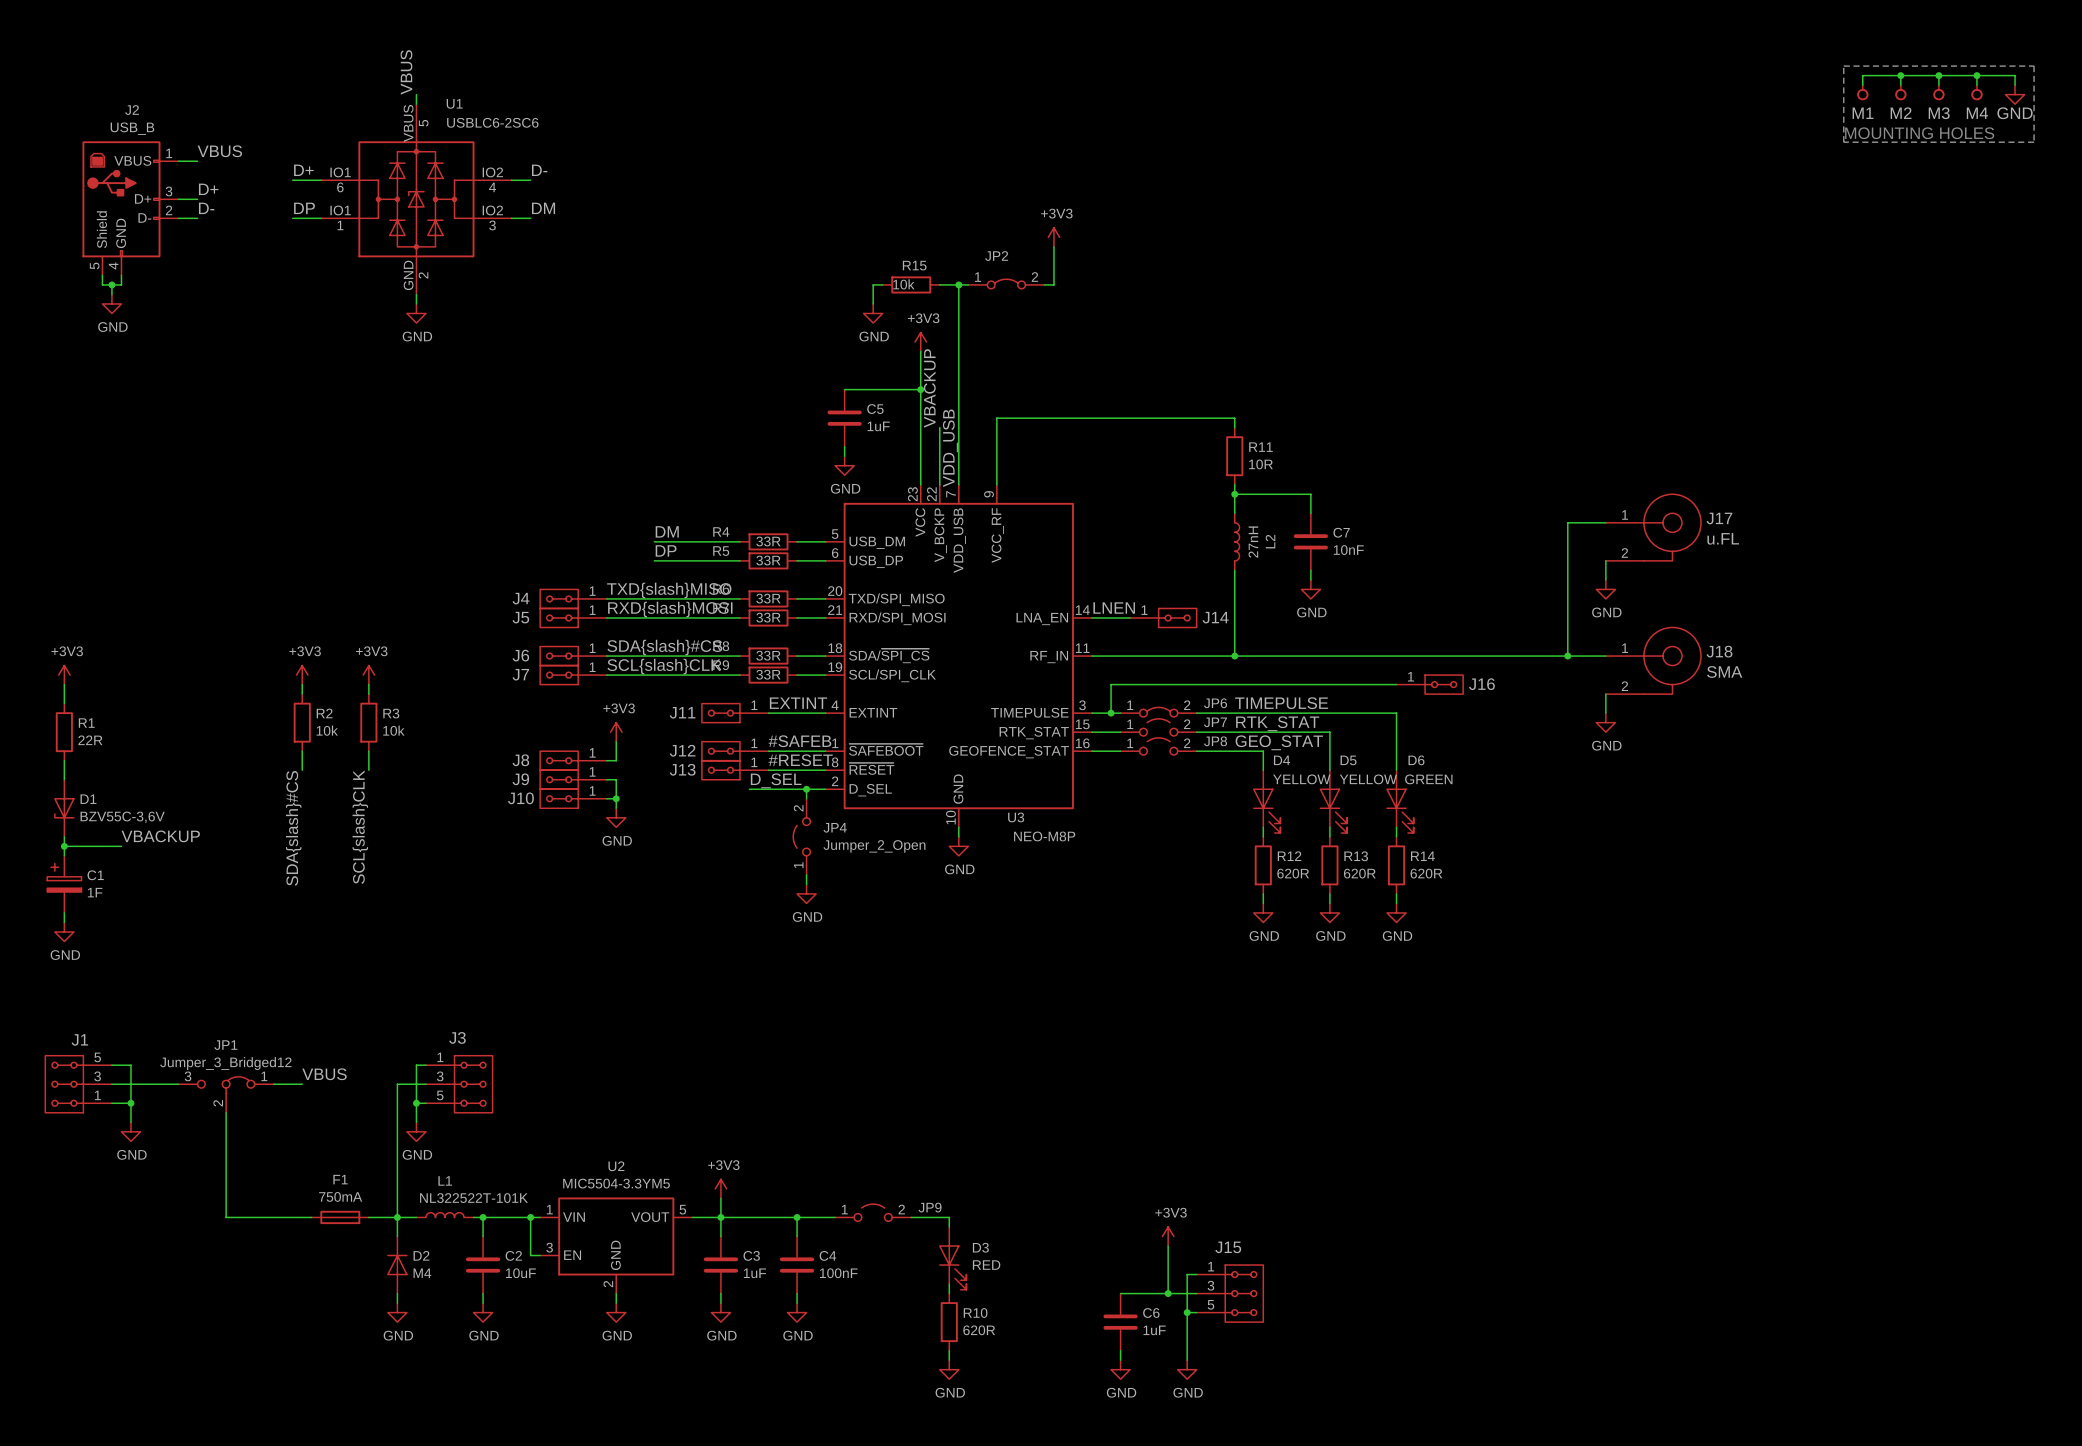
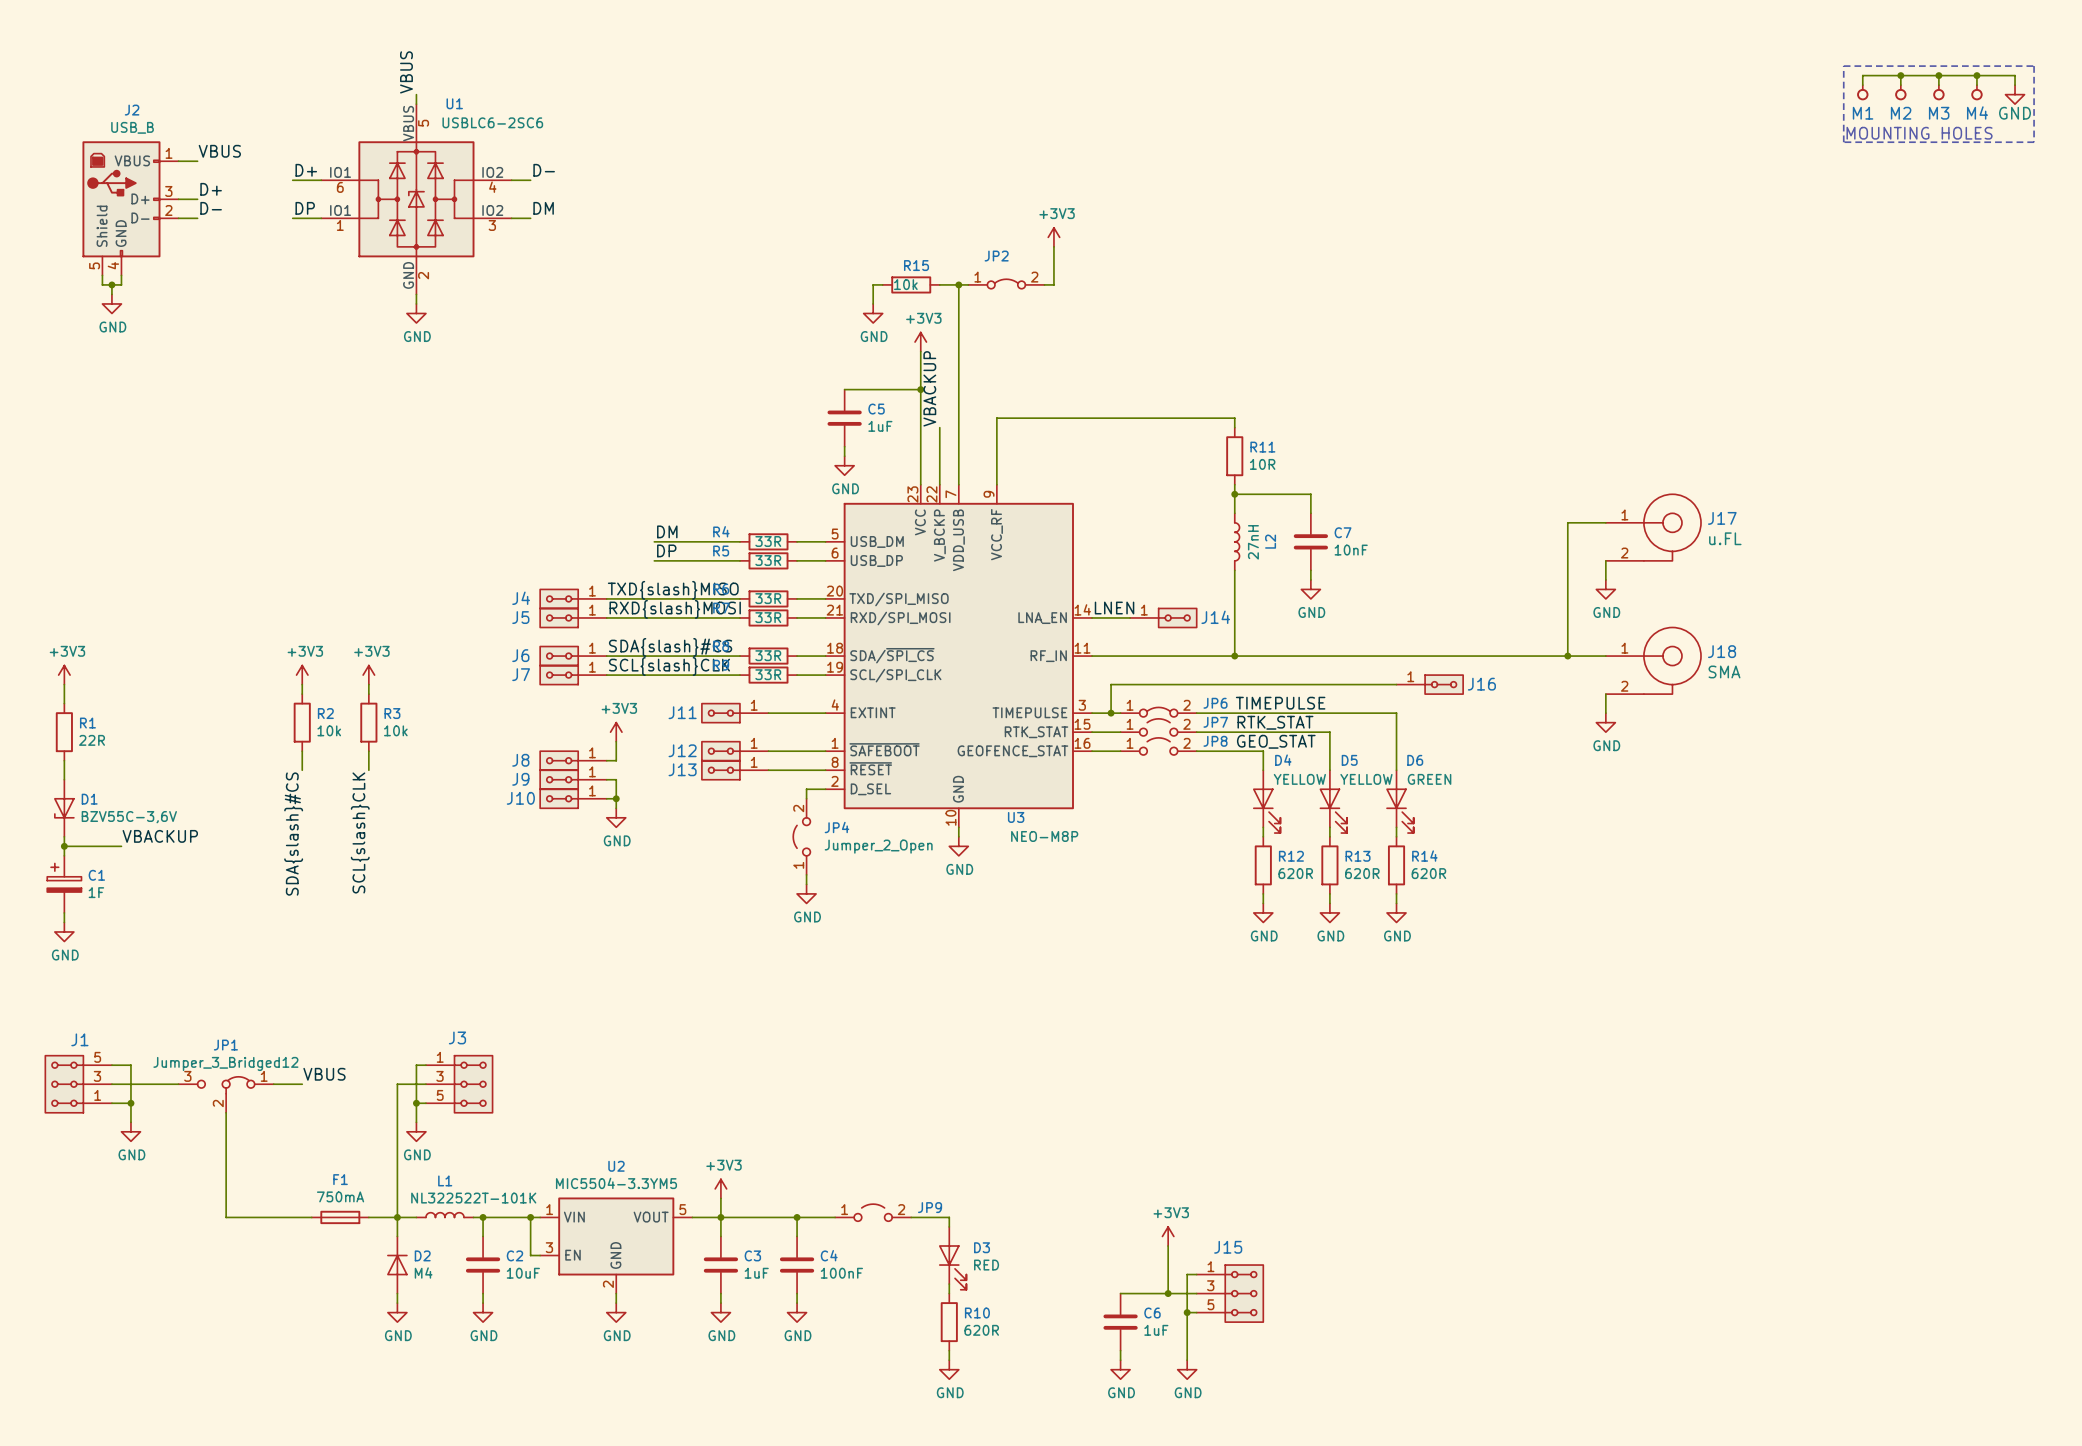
label: VDD_USB (950, 448) -> none
label: EXTINT (798, 703) -> none
label: #SAFEB (799, 741) -> none
label: #RESET (800, 760) -> none
label: D_SEL (776, 780) -> none
wire: (749, 789) (806, 789) -> none
junction: (806, 789) -> none

